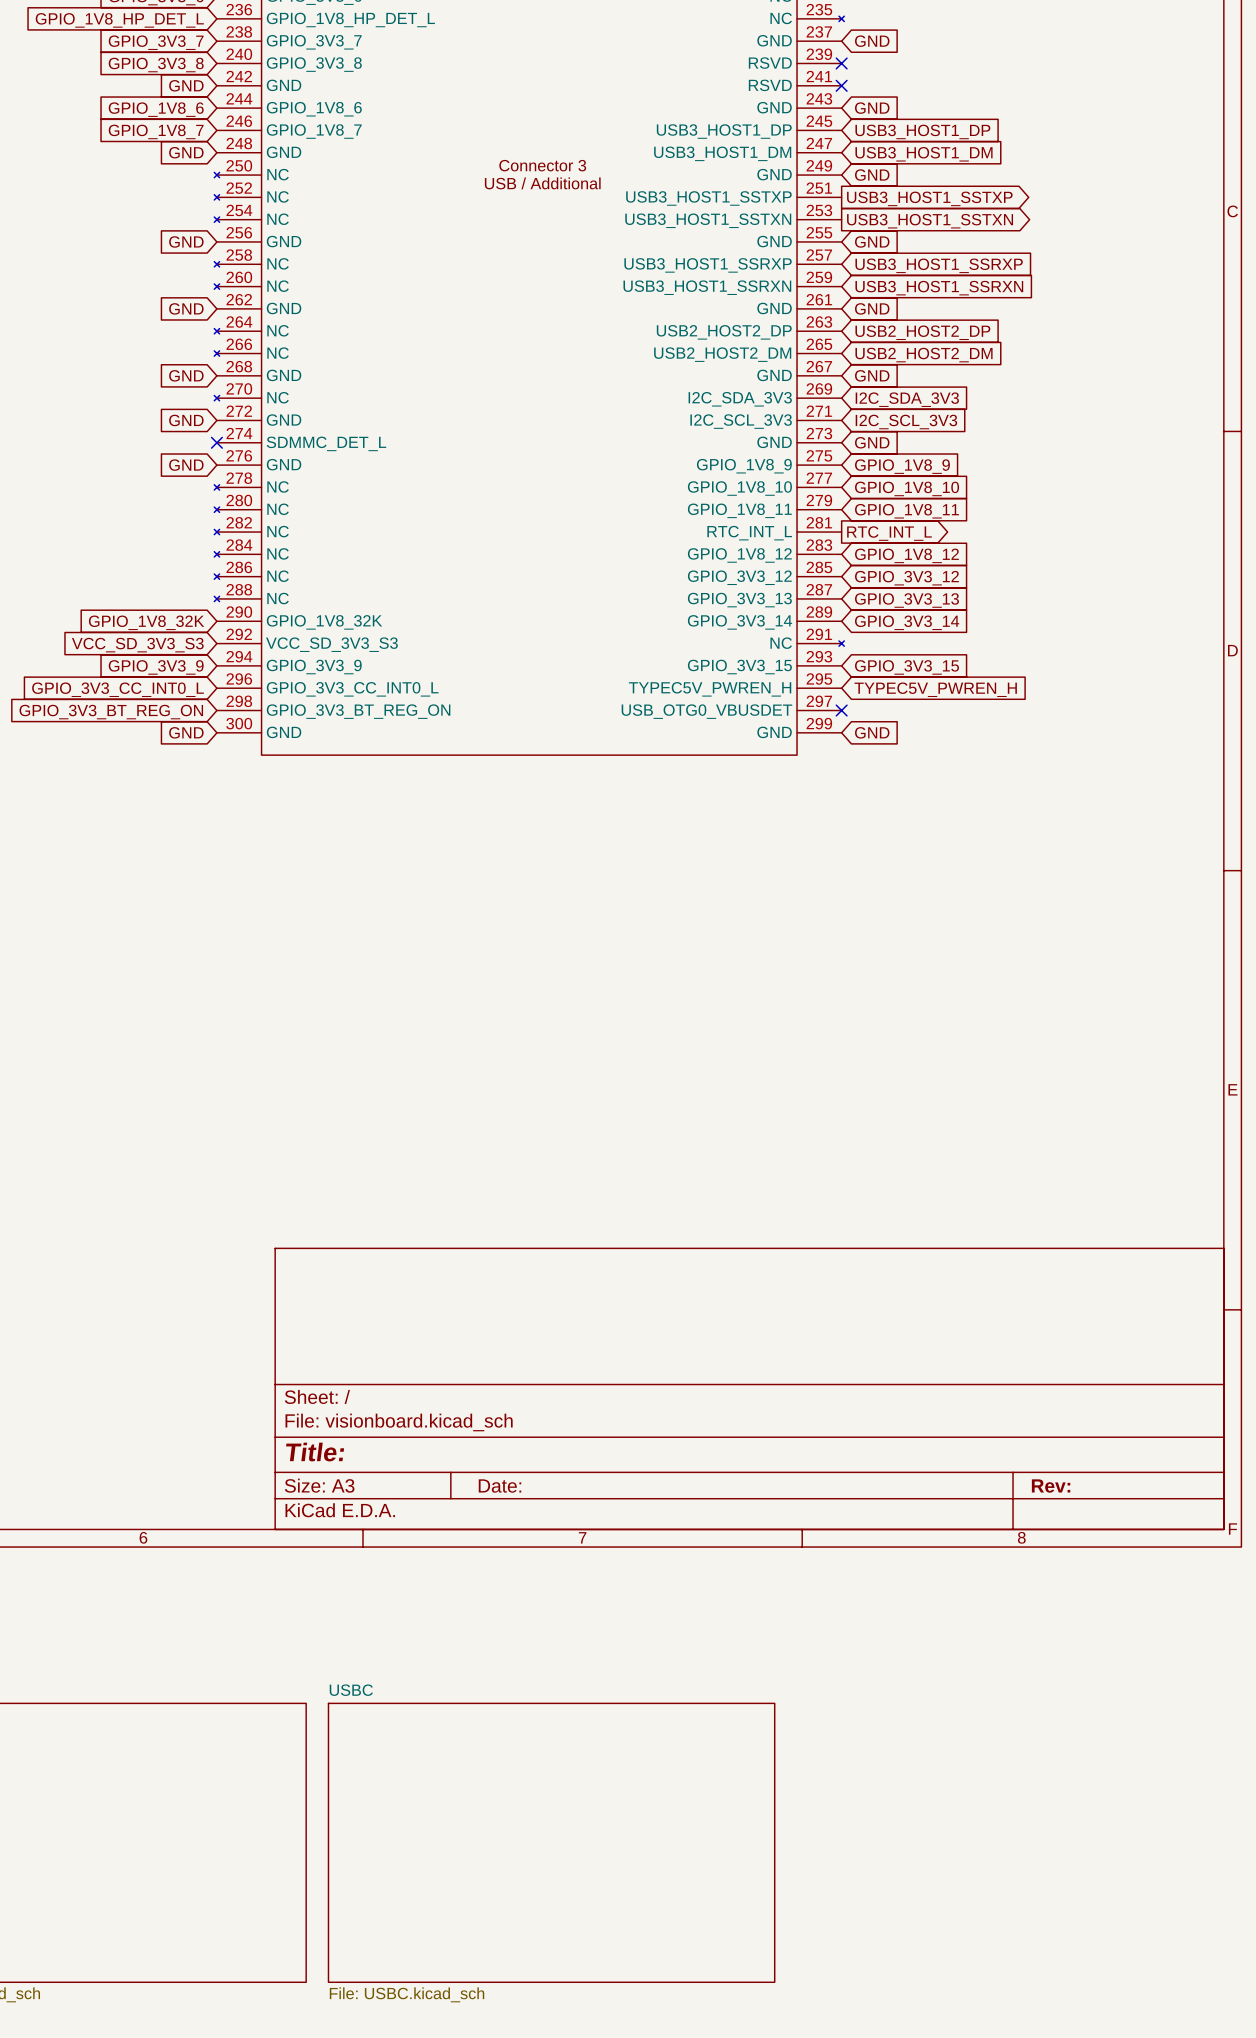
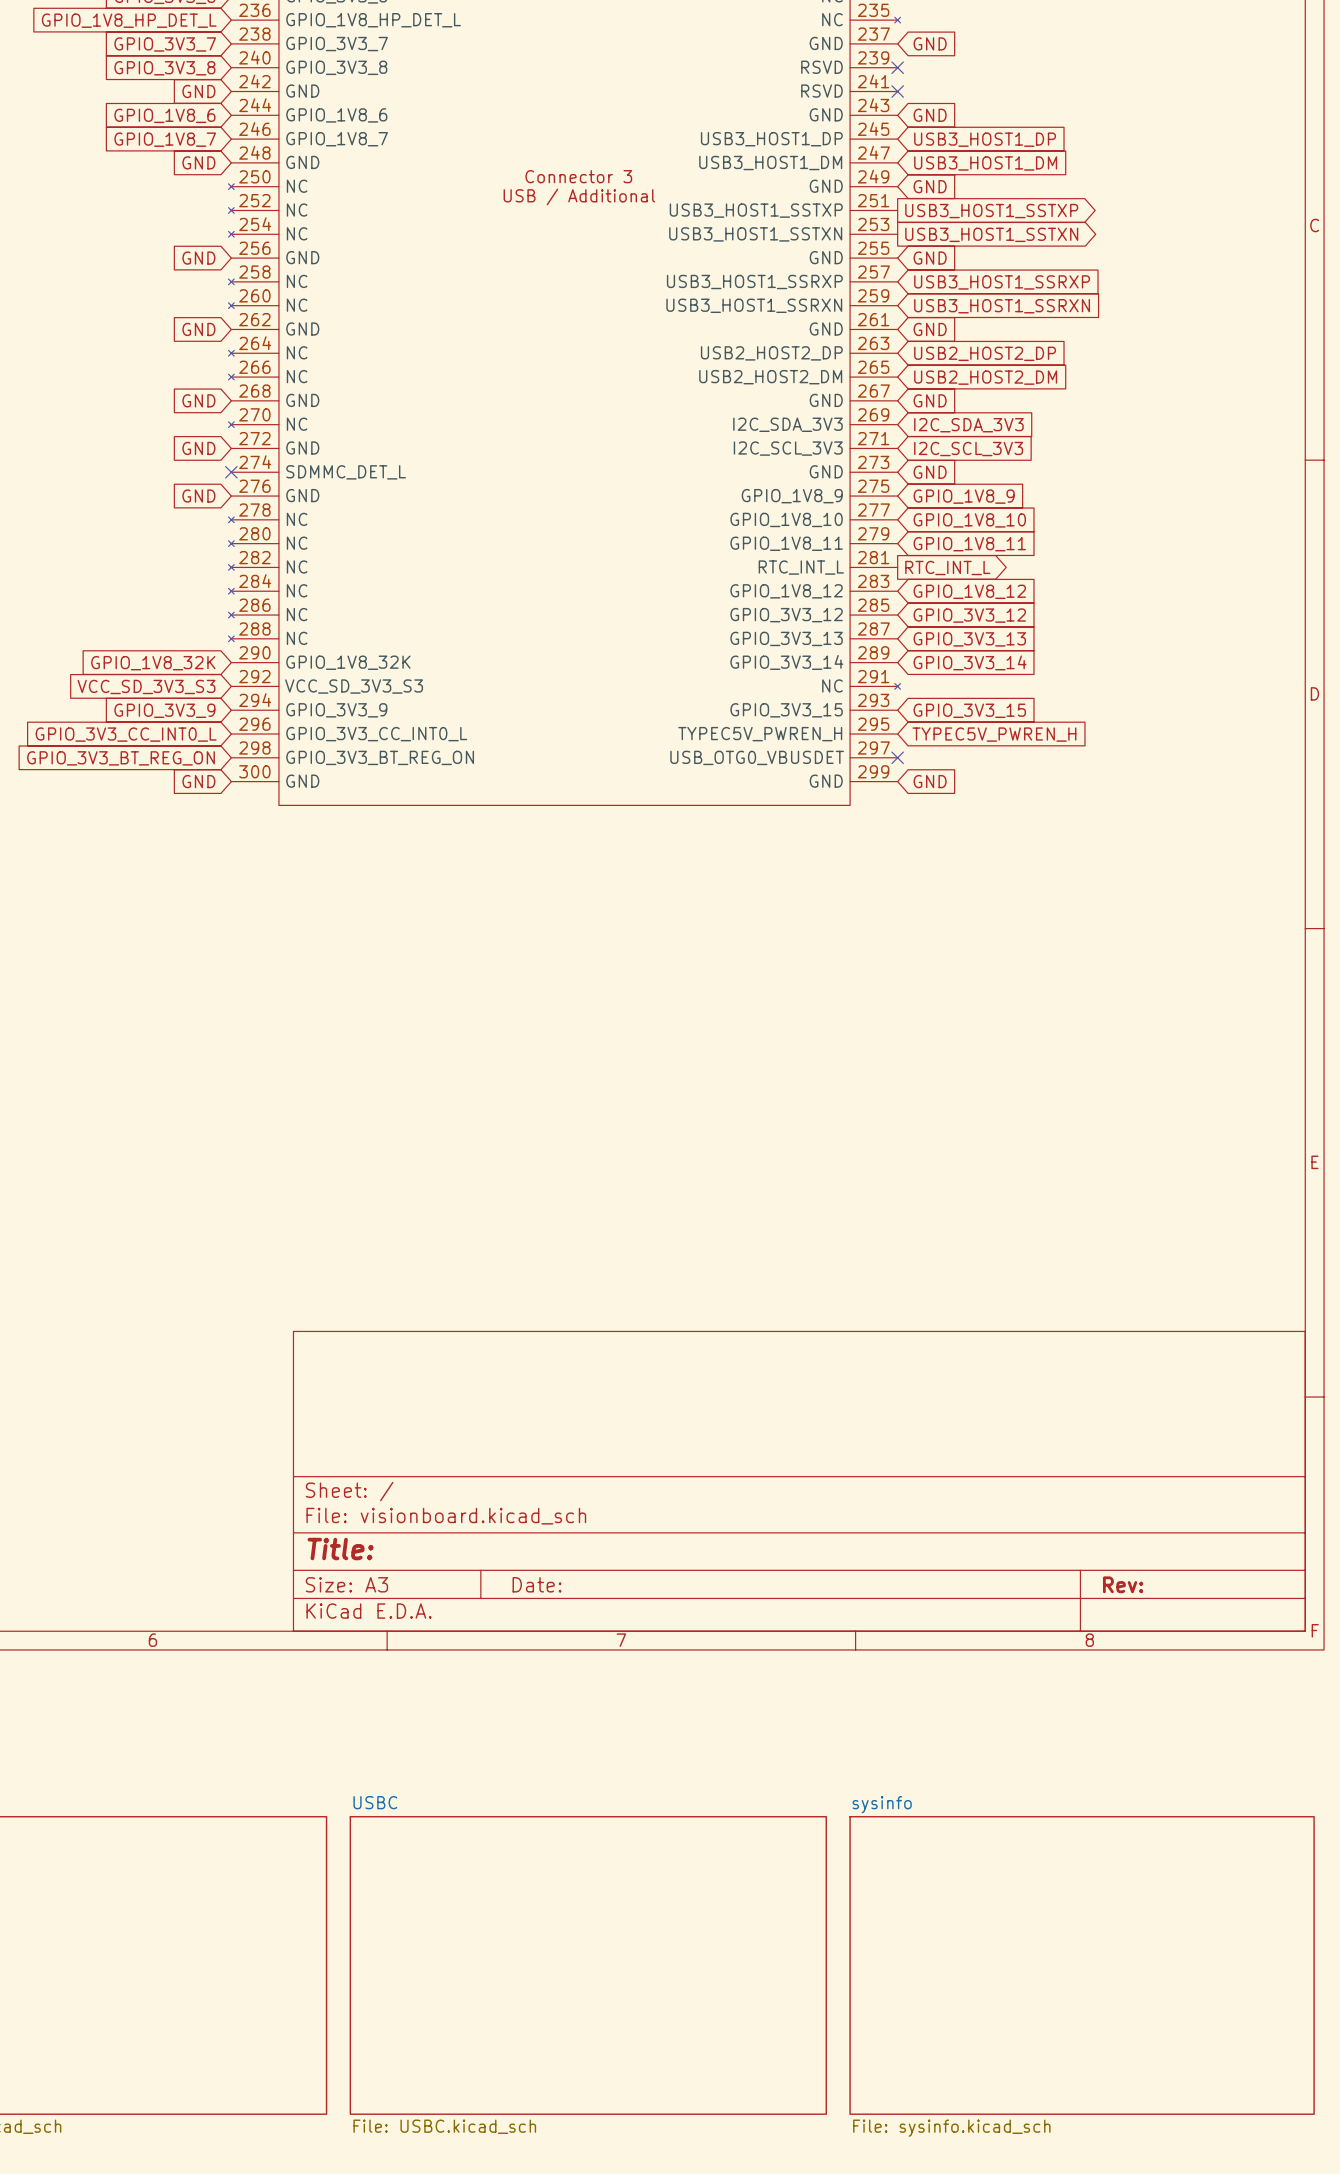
sheet sysinfo: none -> File: sysinfo.kicad_sch (1082, 1965)

